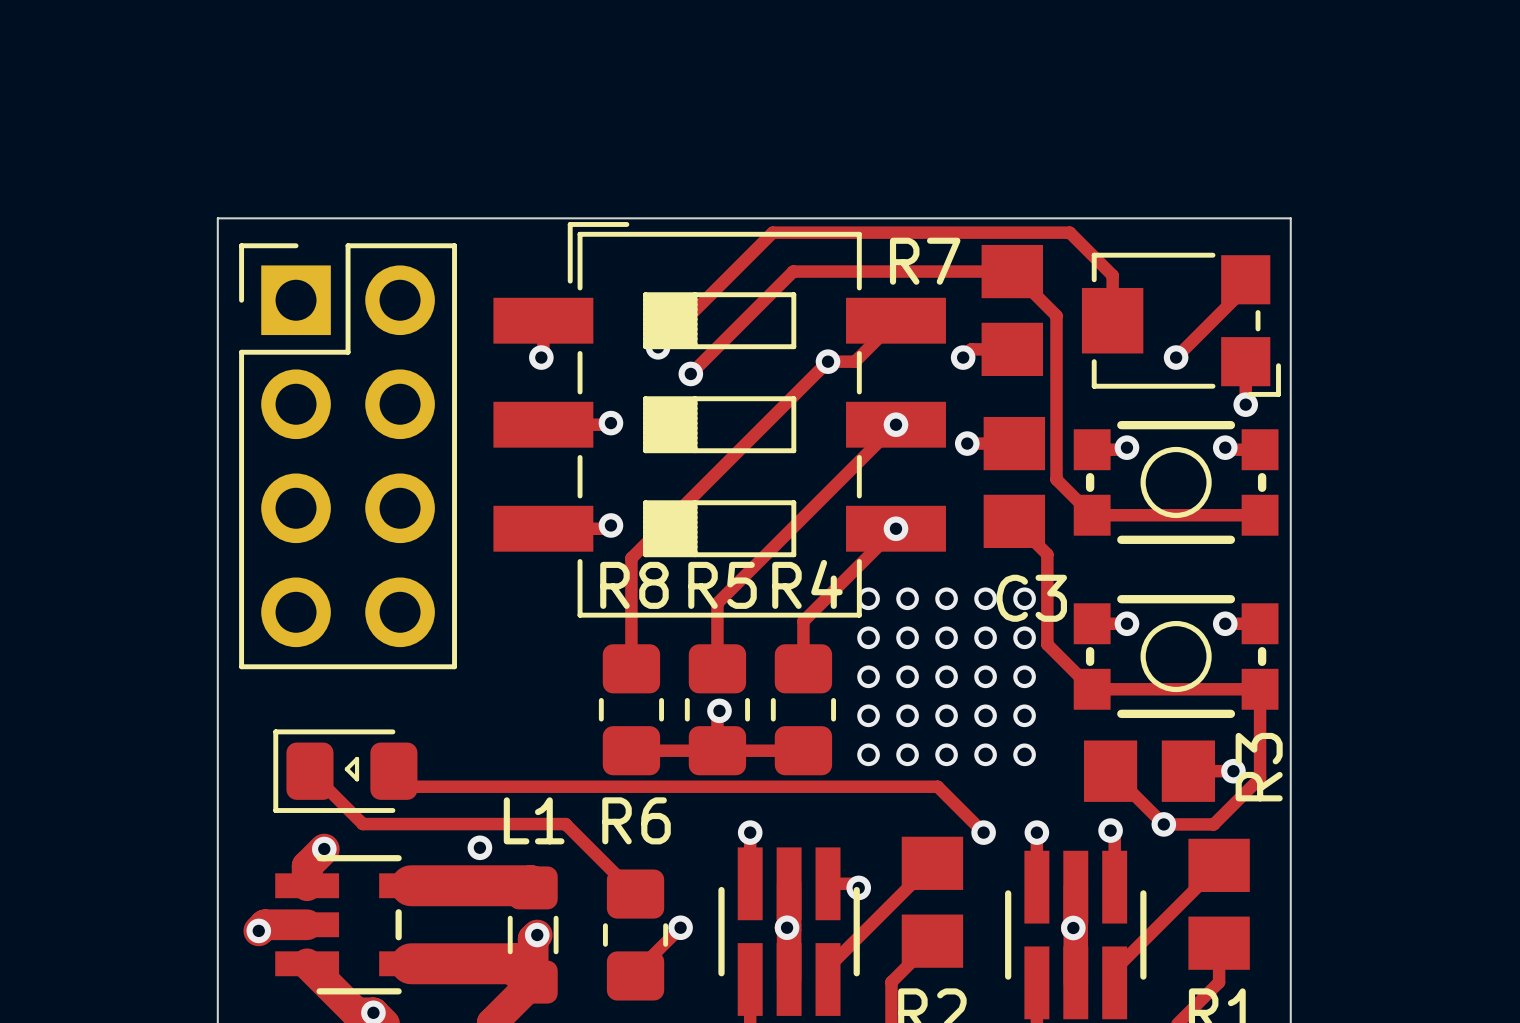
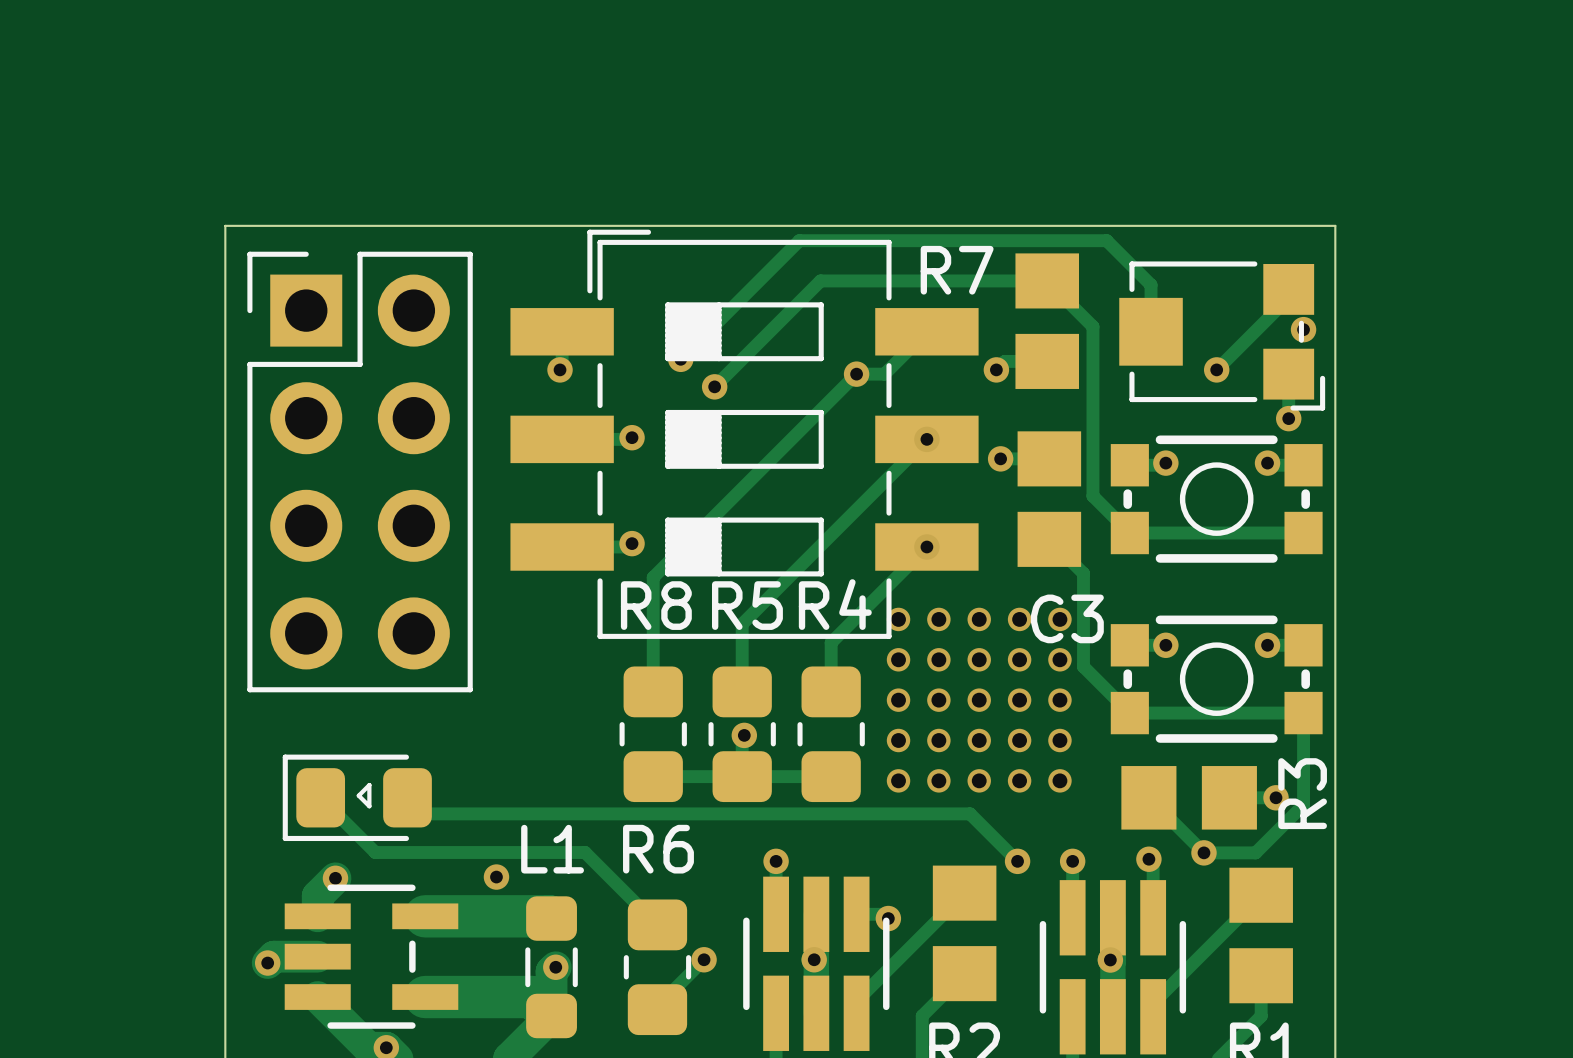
via: none -> (1303, 329)

